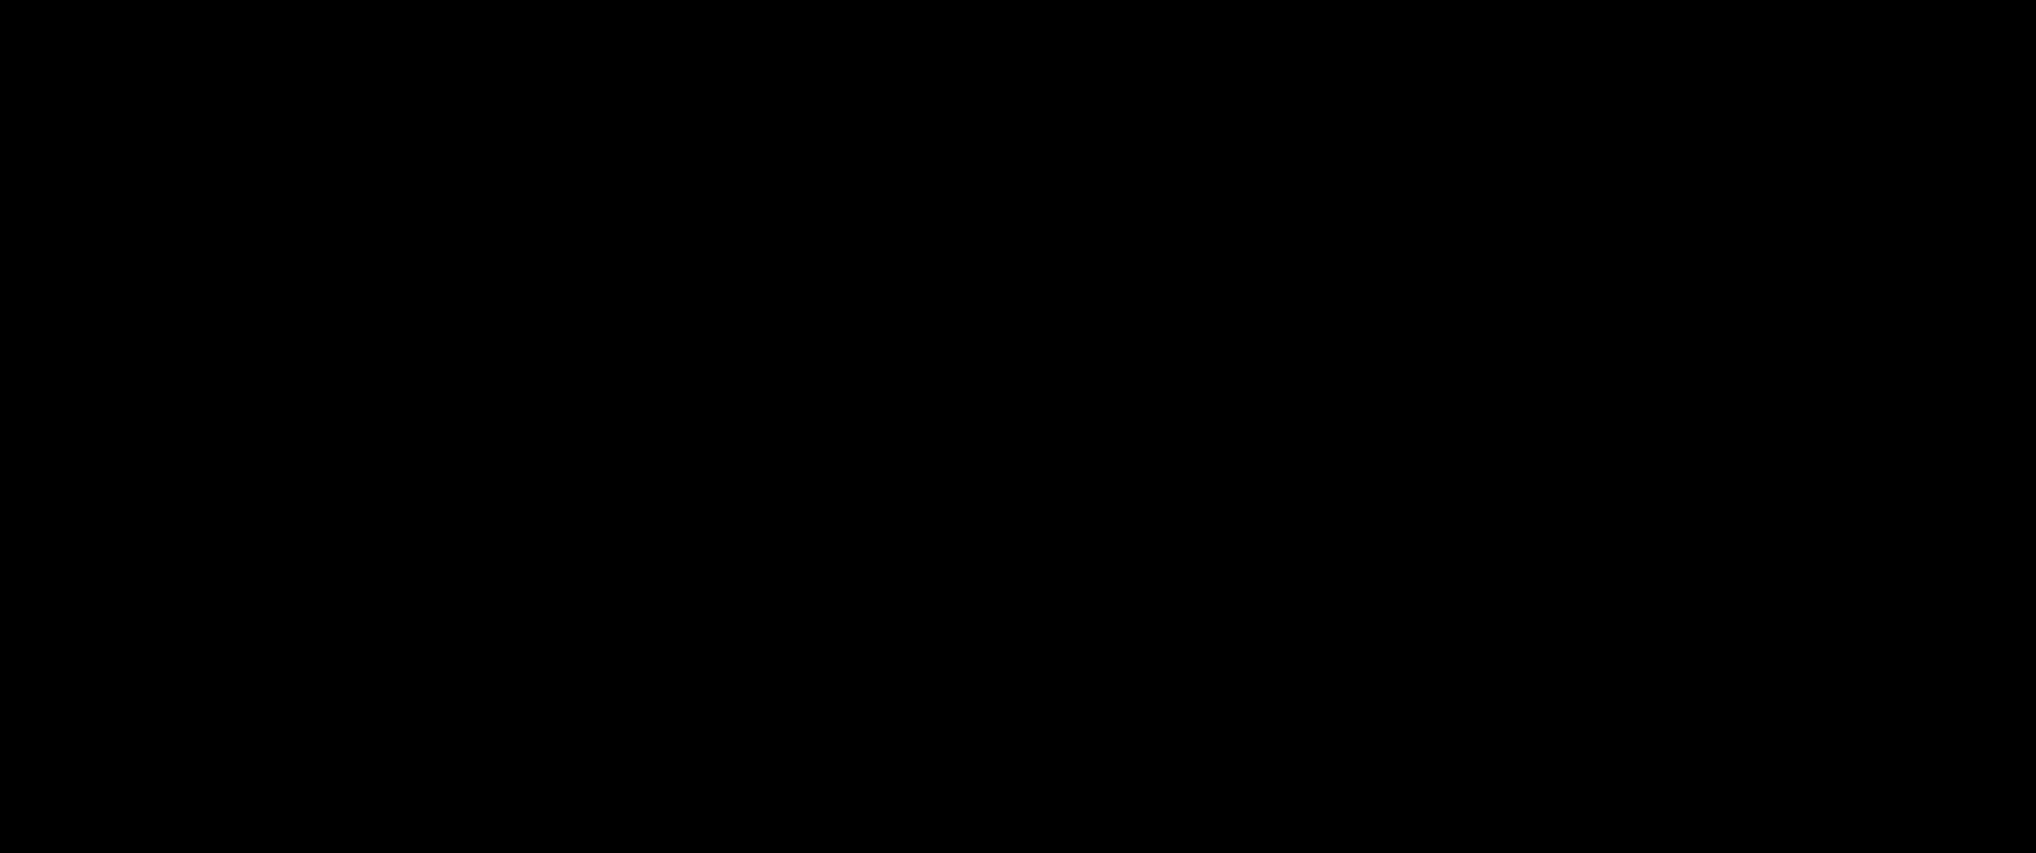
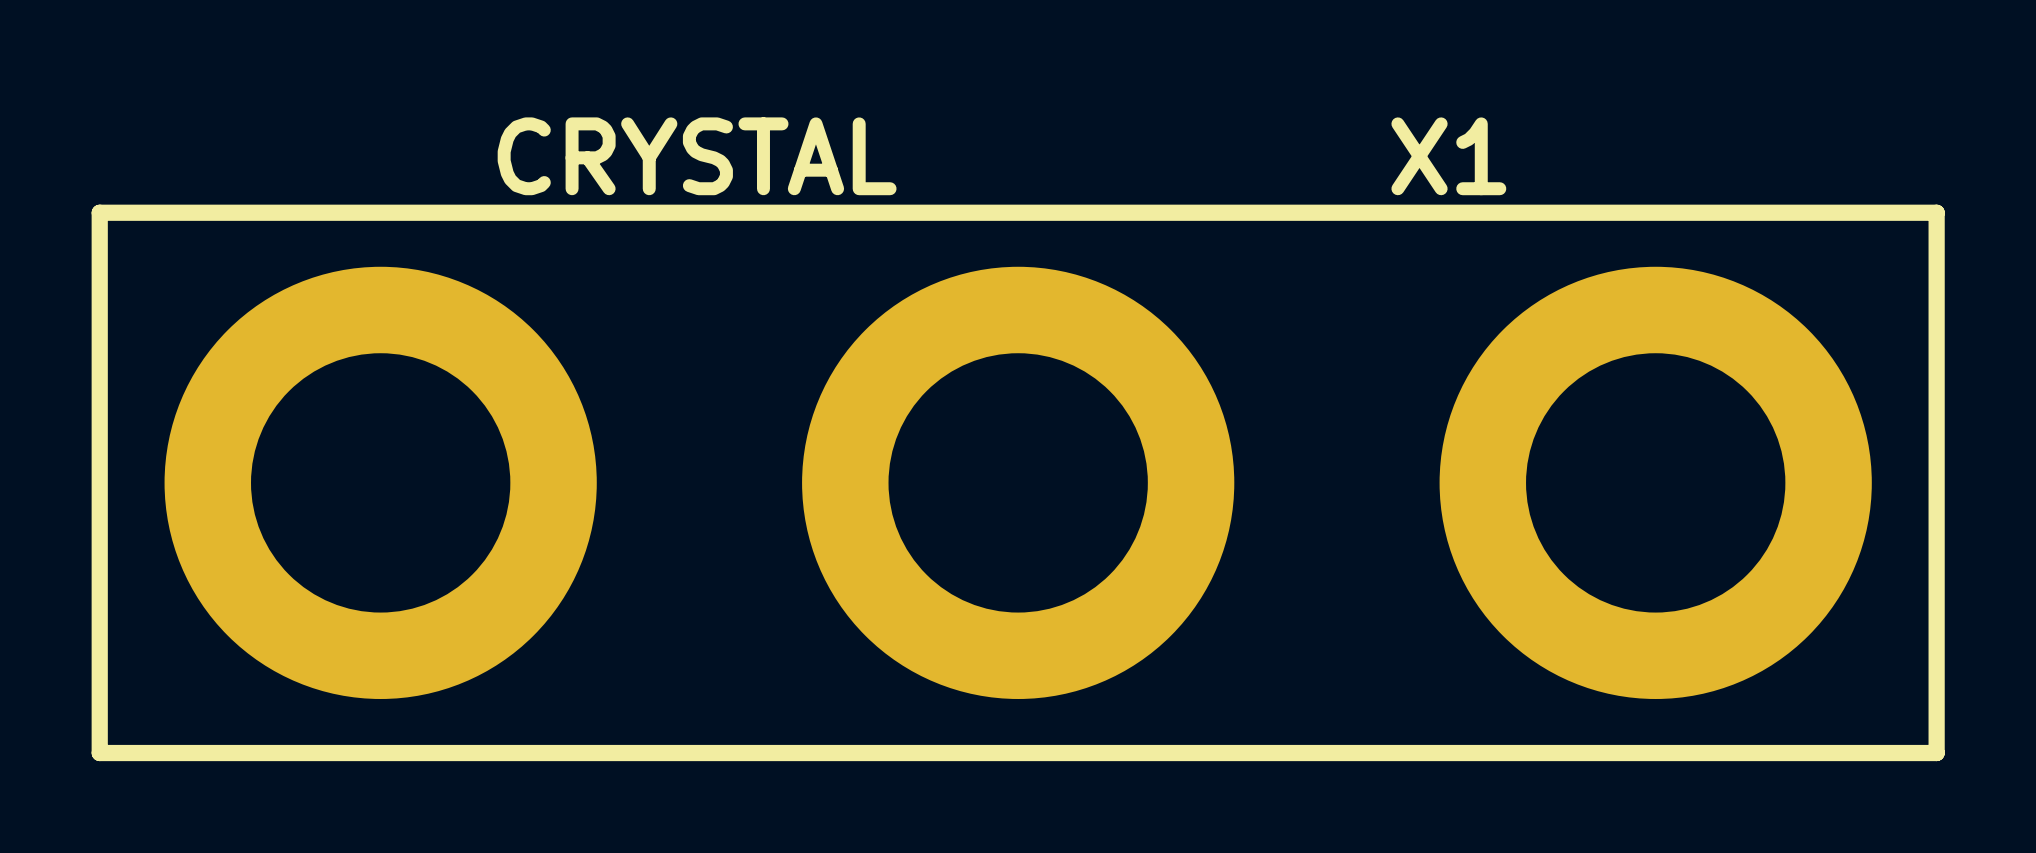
X1: none -> CRYSTAL (1018, 482)

